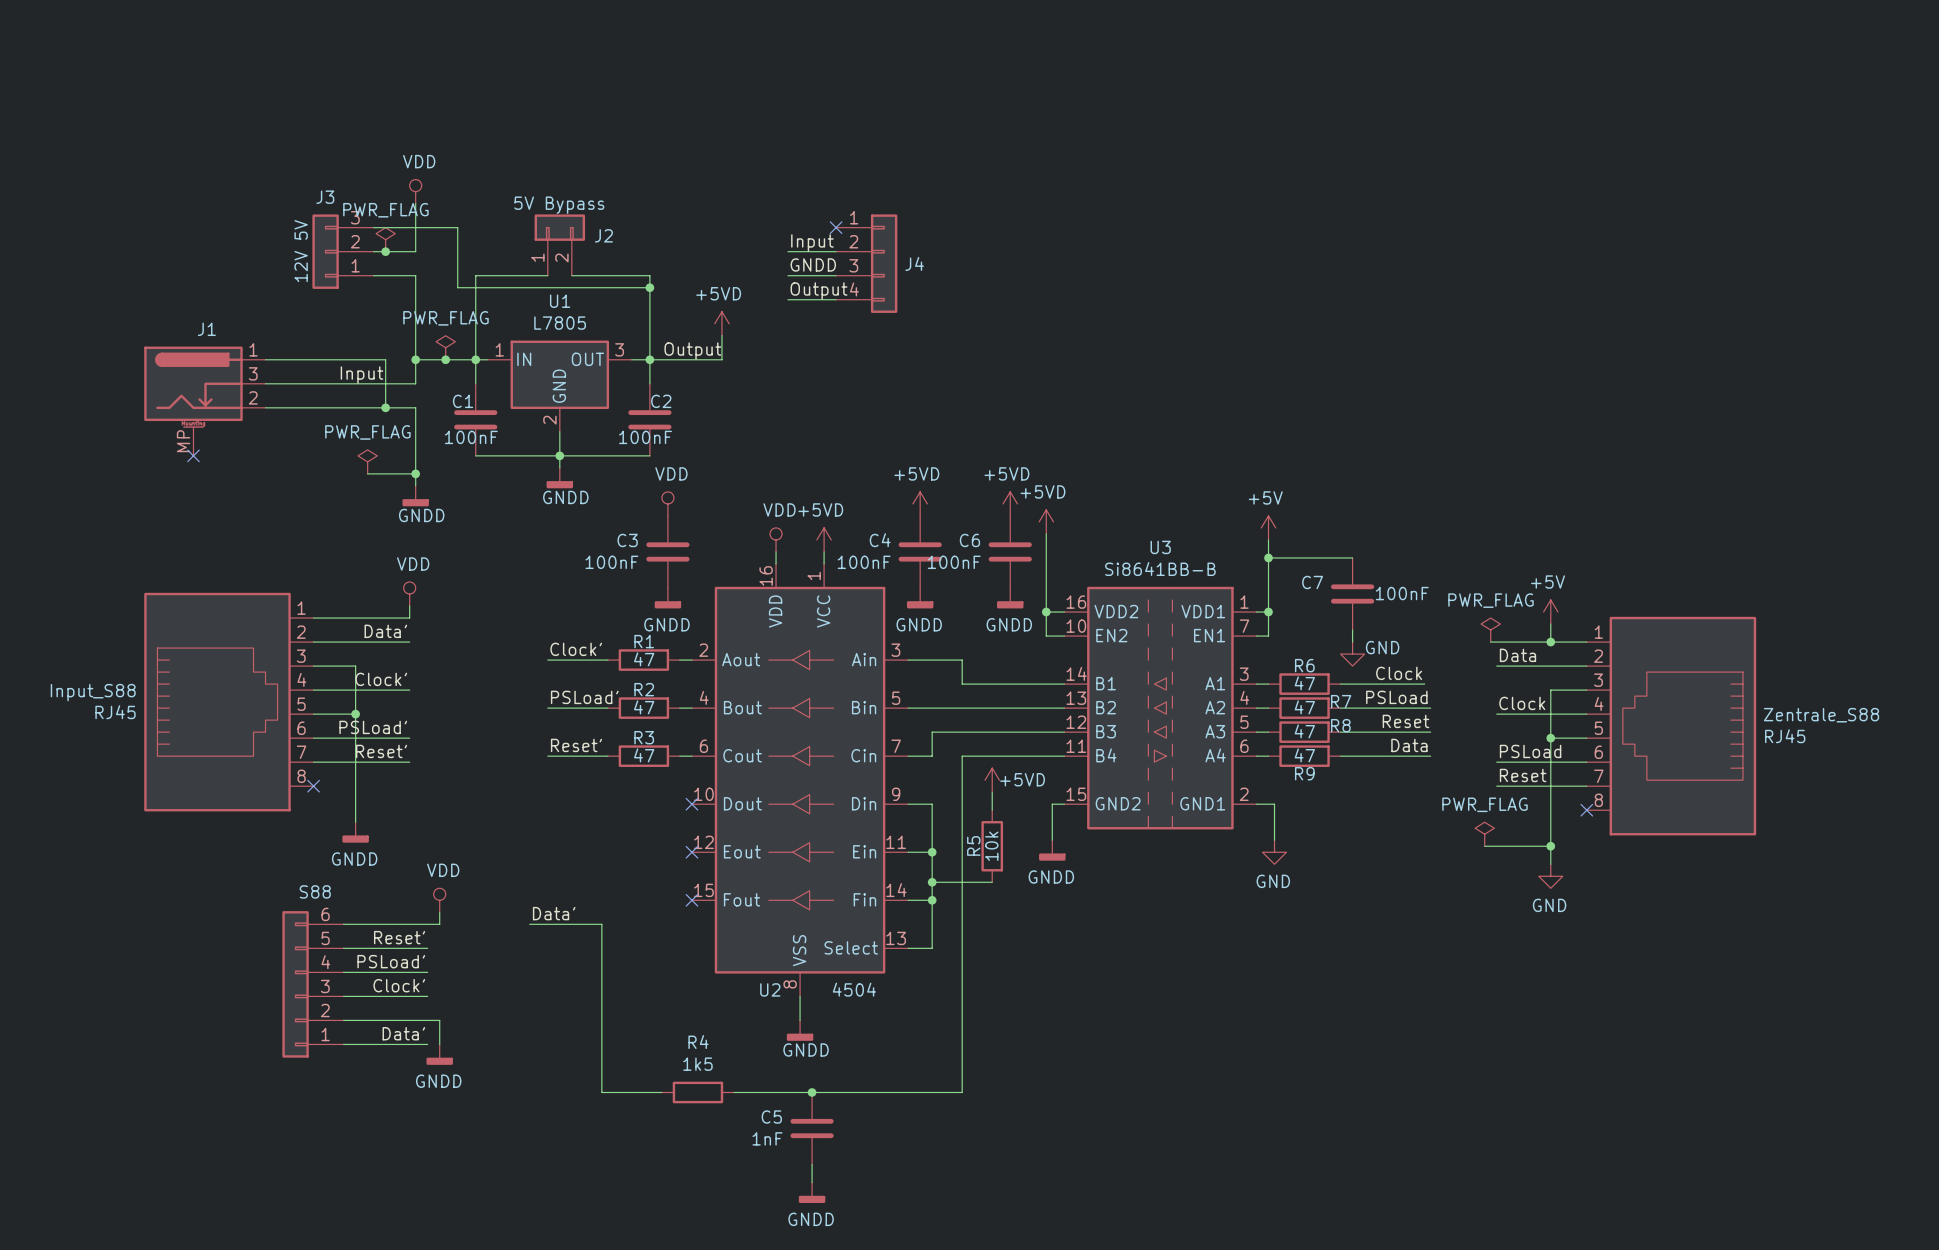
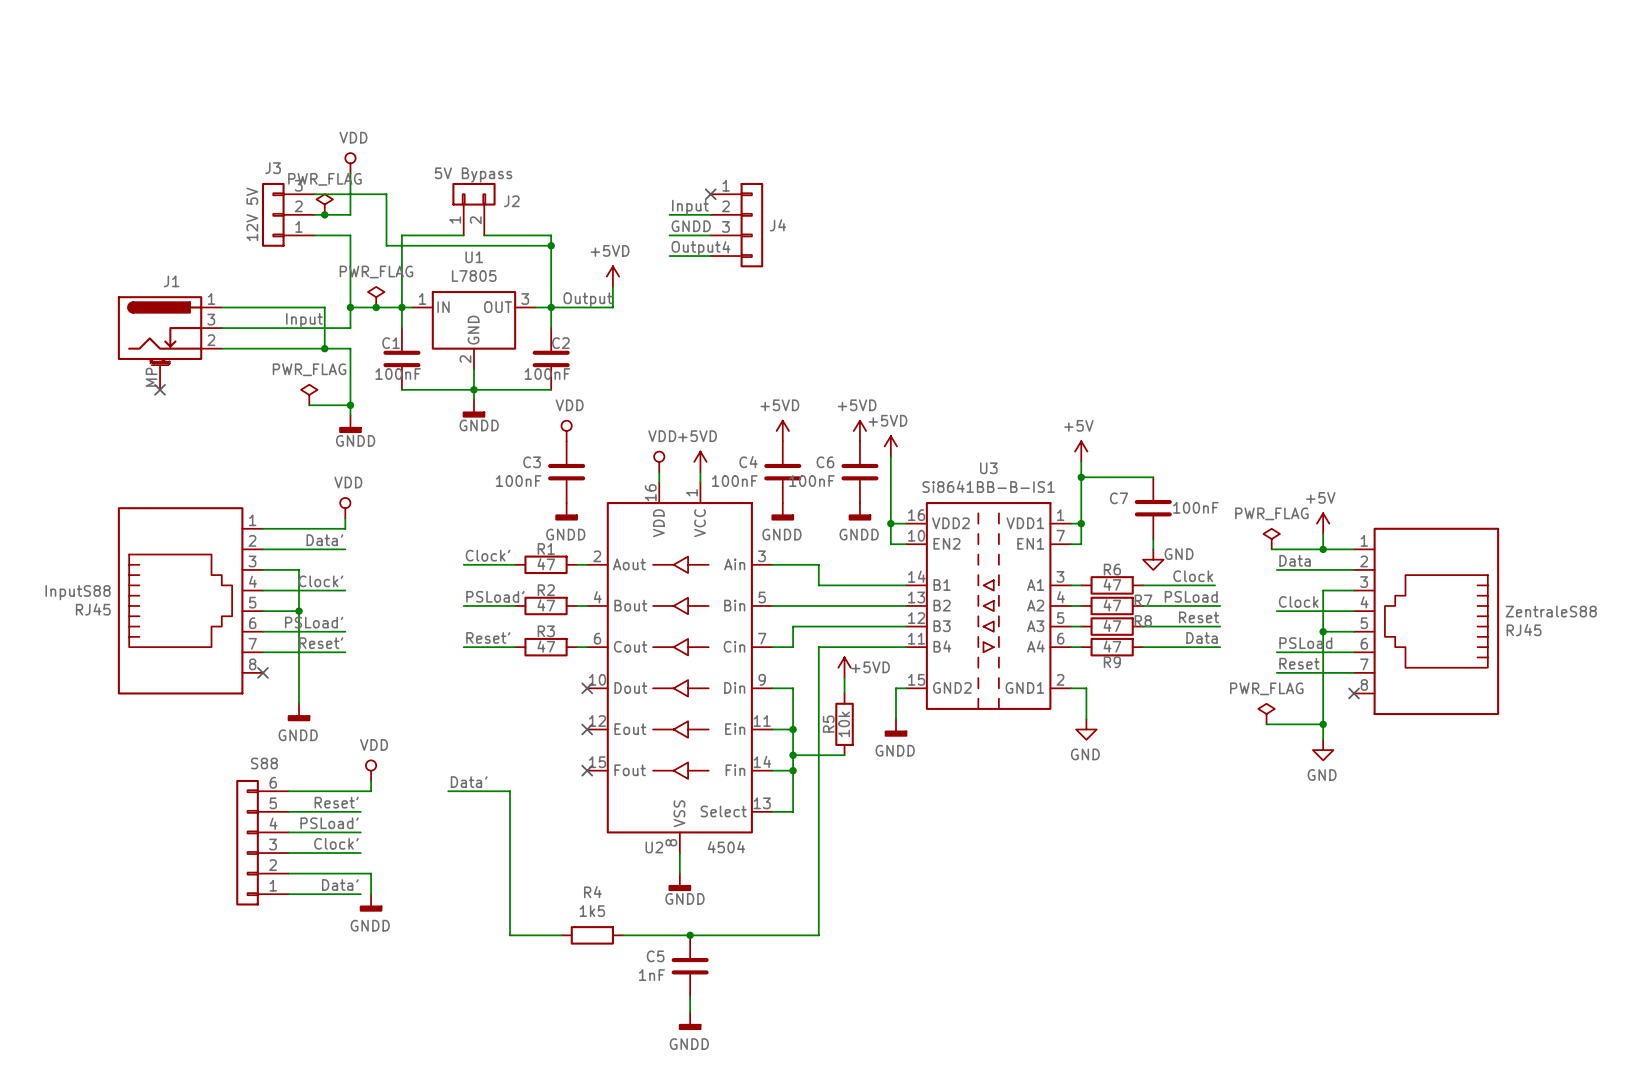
U3 value: Si8641BB-B (1160, 569) -> Si8641BB-B-IS1 (988, 486)
Input_S88 name: Input_S88 (93, 692) -> InputS88 (78, 592)
Zentrale_S88 name: Zentrale_S88 (1821, 715) -> ZentraleS88 (1551, 611)

